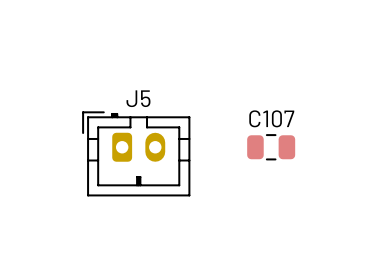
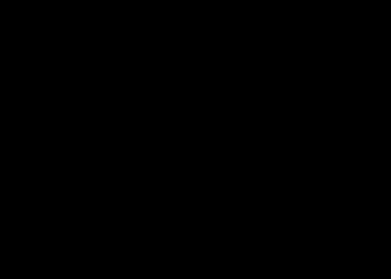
C107: (271, 147) -> none
J5: (136, 153) -> none

